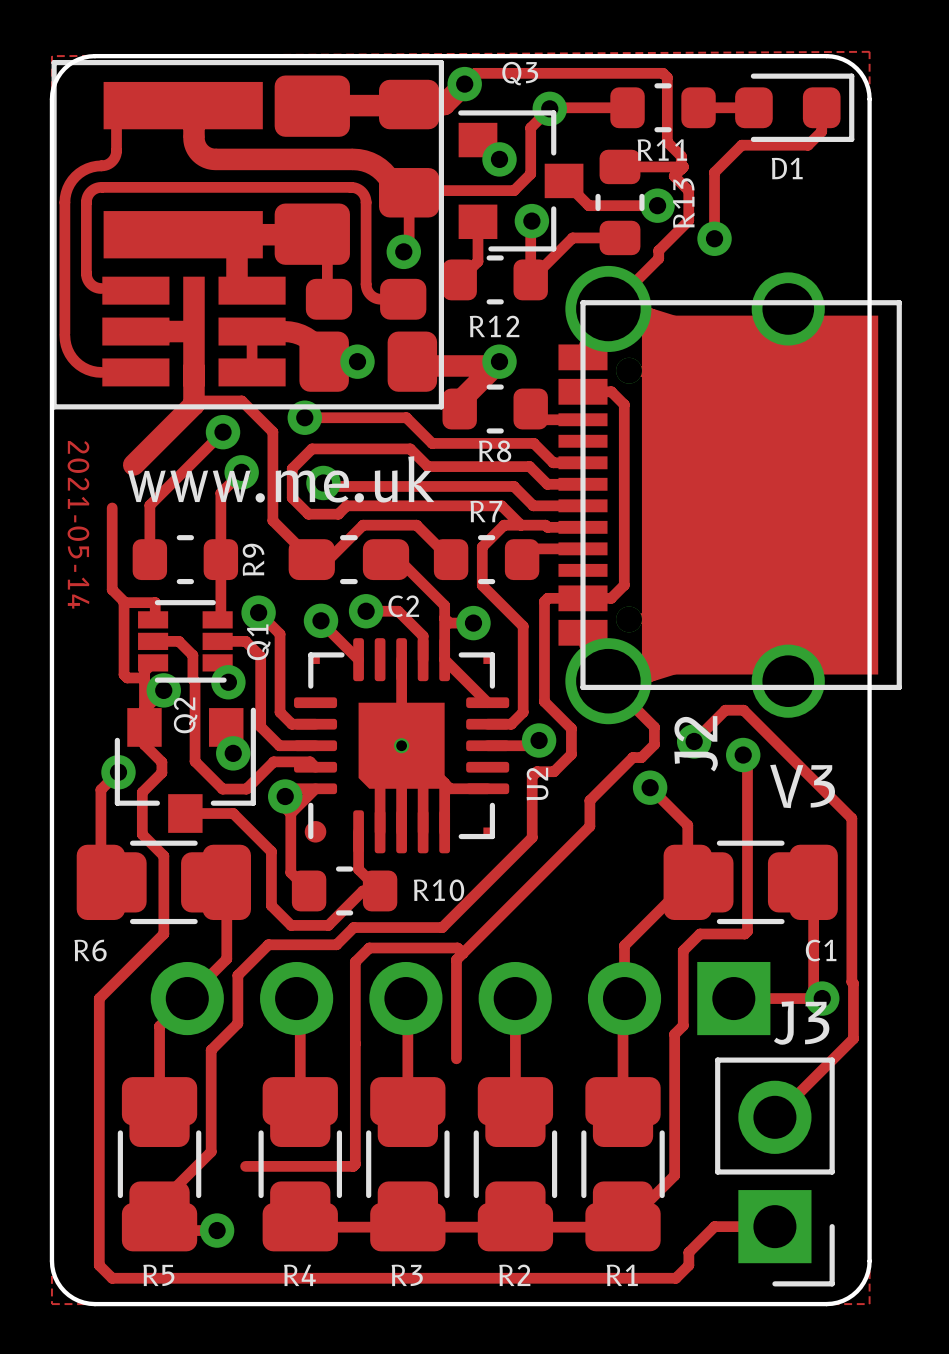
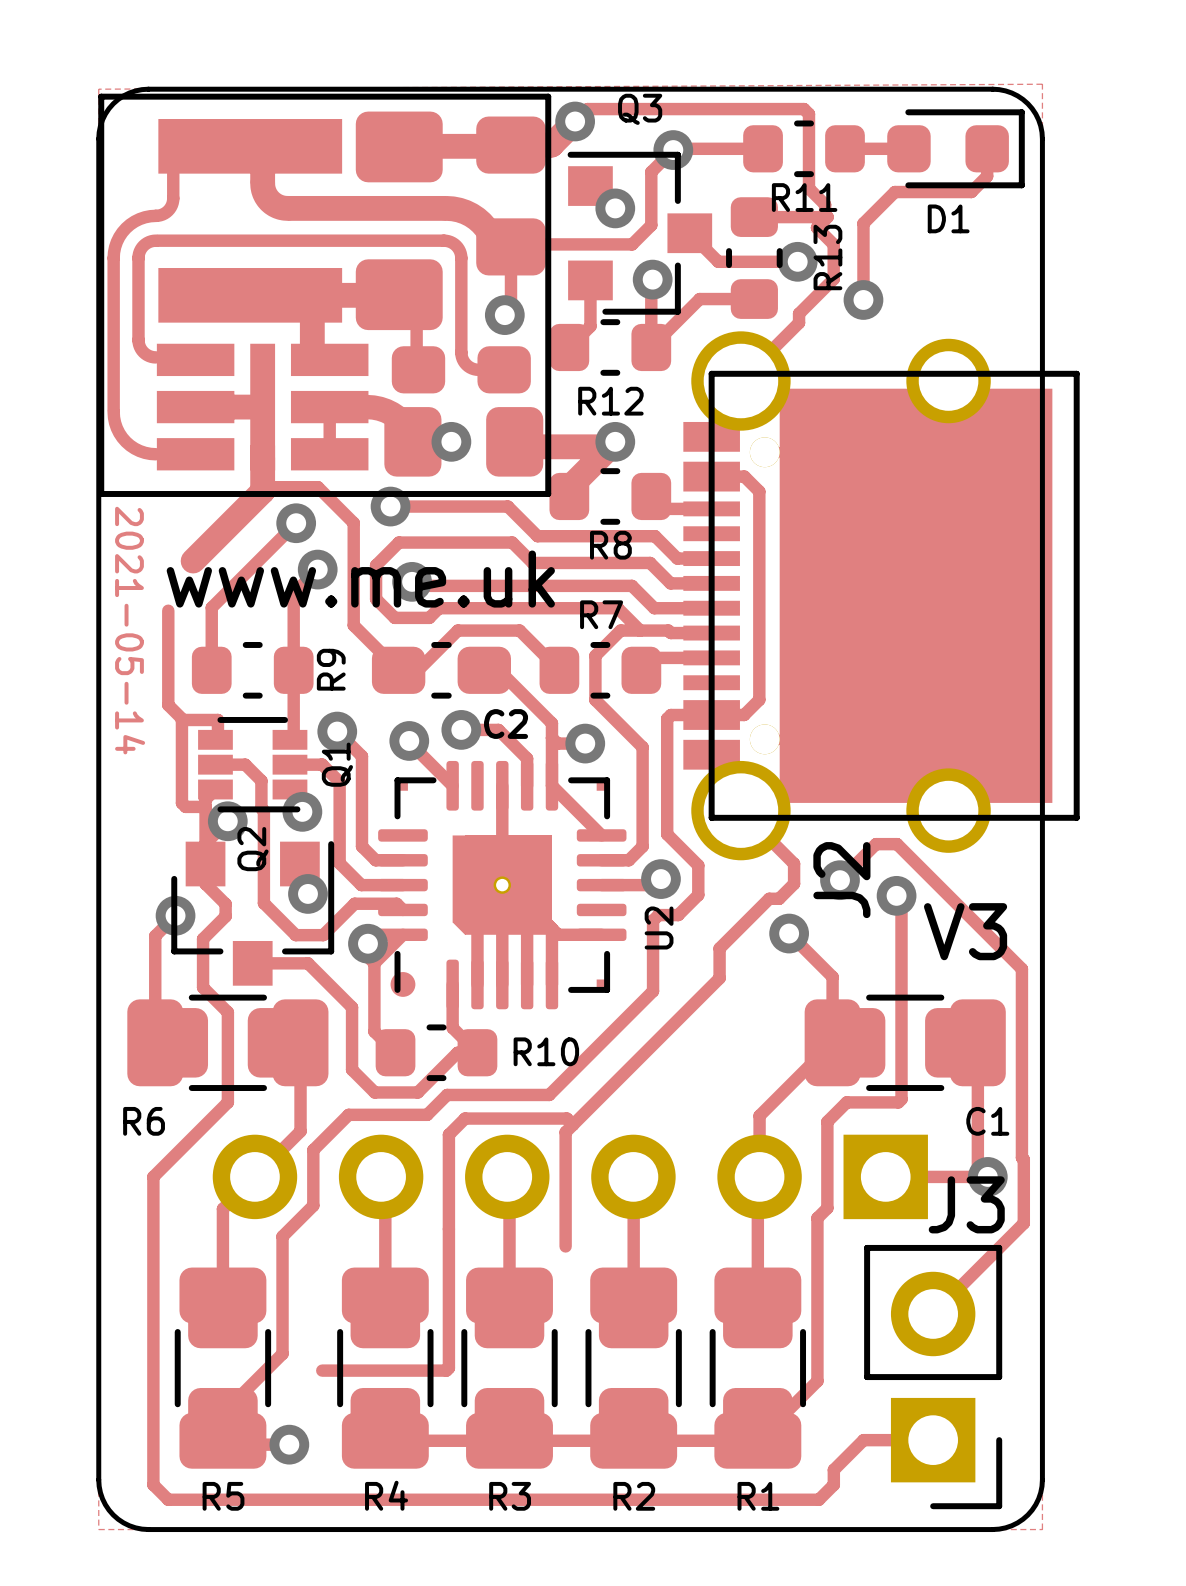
J2 footprint: [558, 265, 902, 725] -> [683, 331, 1080, 861]
U2 footprint: [294, 638, 510, 854] -> [378, 760, 627, 1010]

